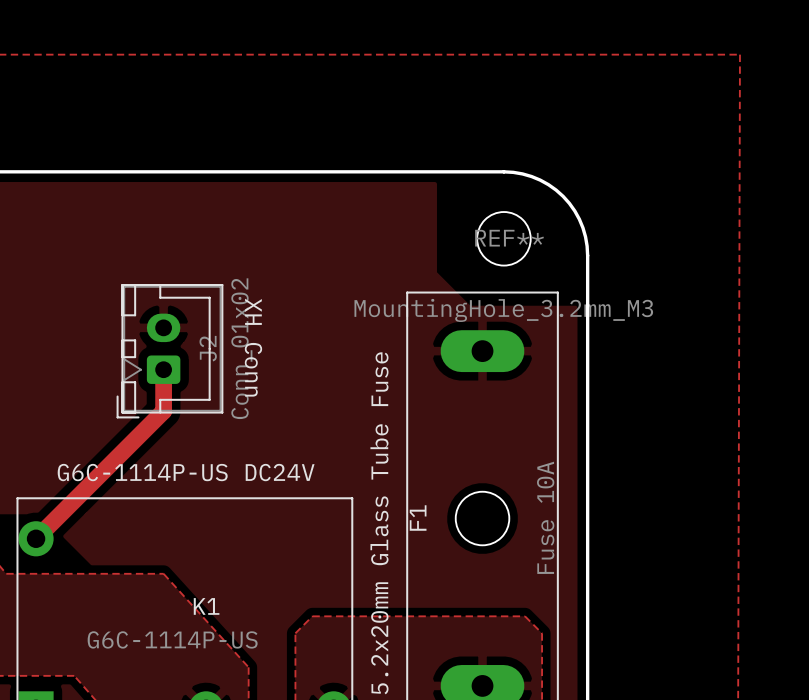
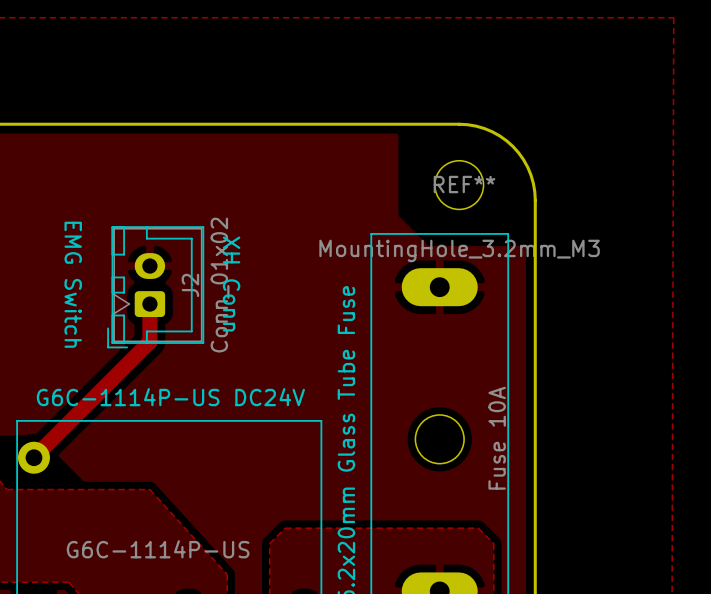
text: none -> EMG Switch (73, 284)
F1 name: F1 (418, 518) -> none
K1 name: K1 (206, 606) -> none

